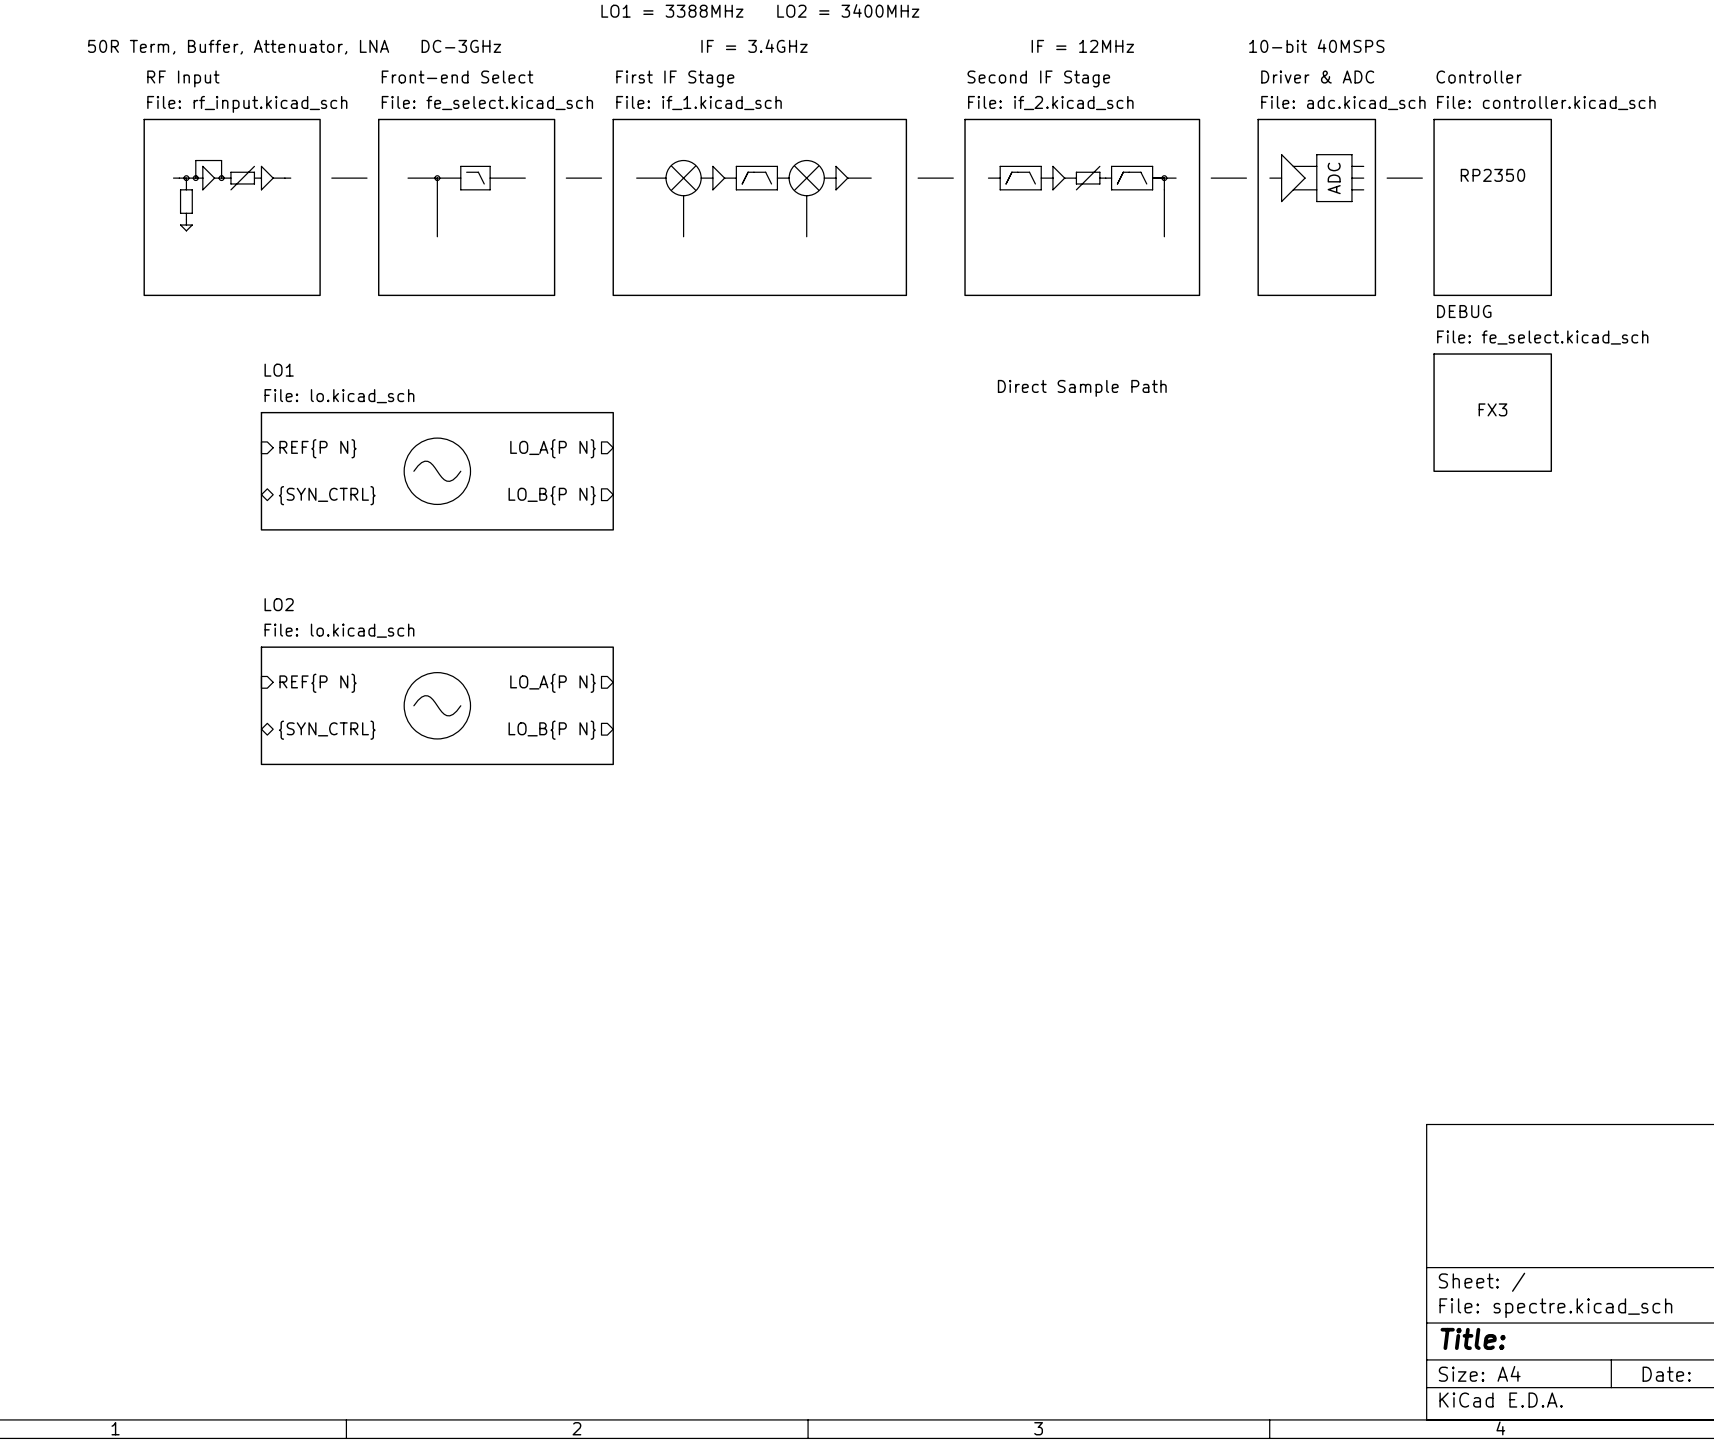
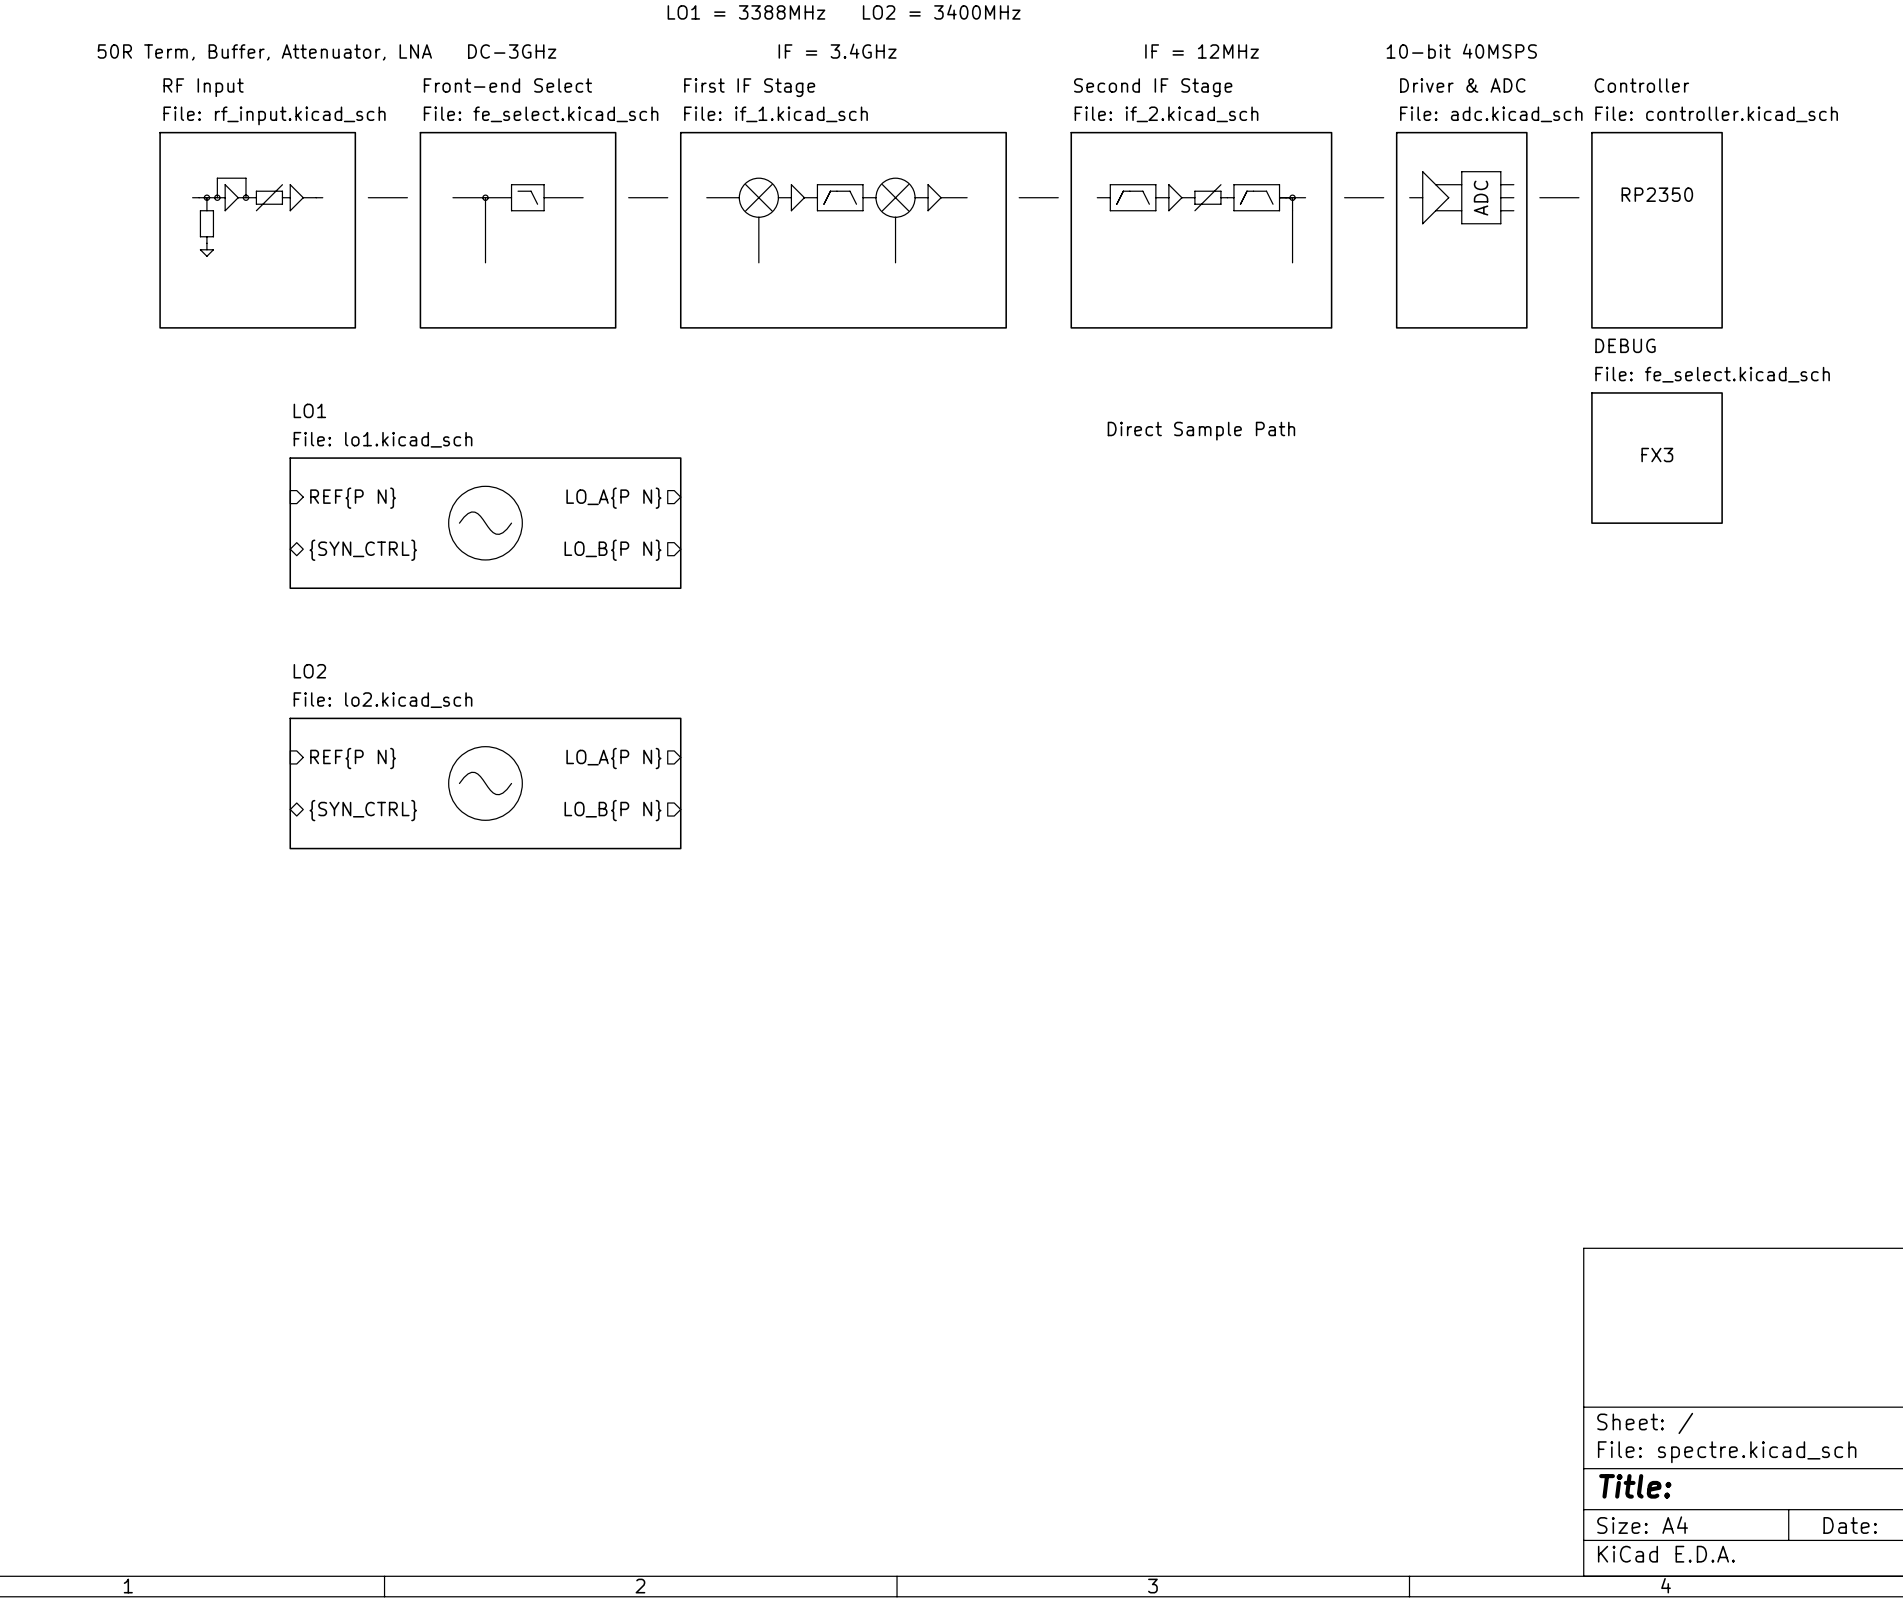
sheet LO1 value: File: lo.kicad_sch (339, 396) -> File: lo1.kicad_sch (383, 439)
sheet LO2 value: File: lo.kicad_sch (339, 630) -> File: lo2.kicad_sch (383, 700)

